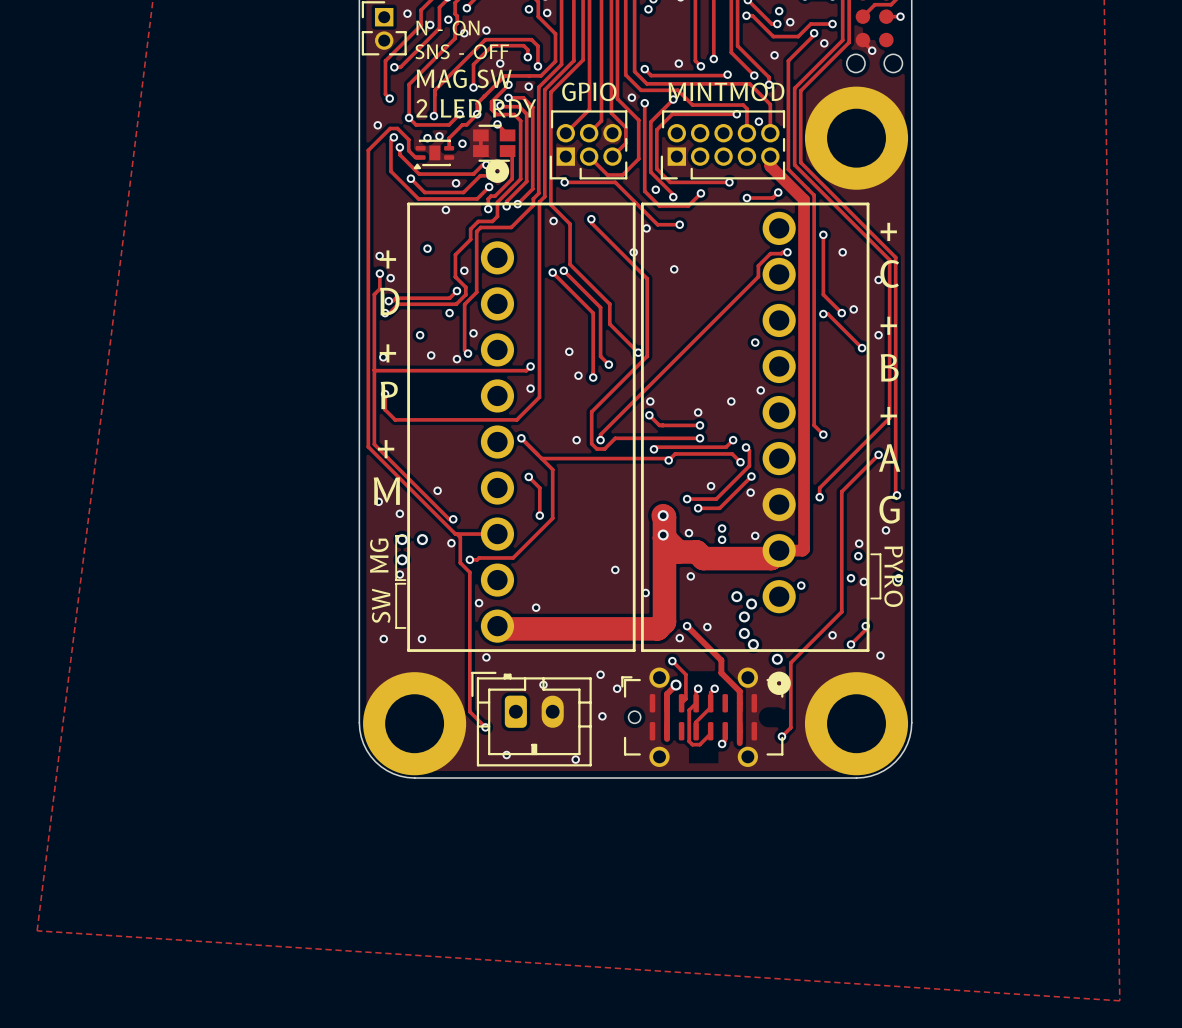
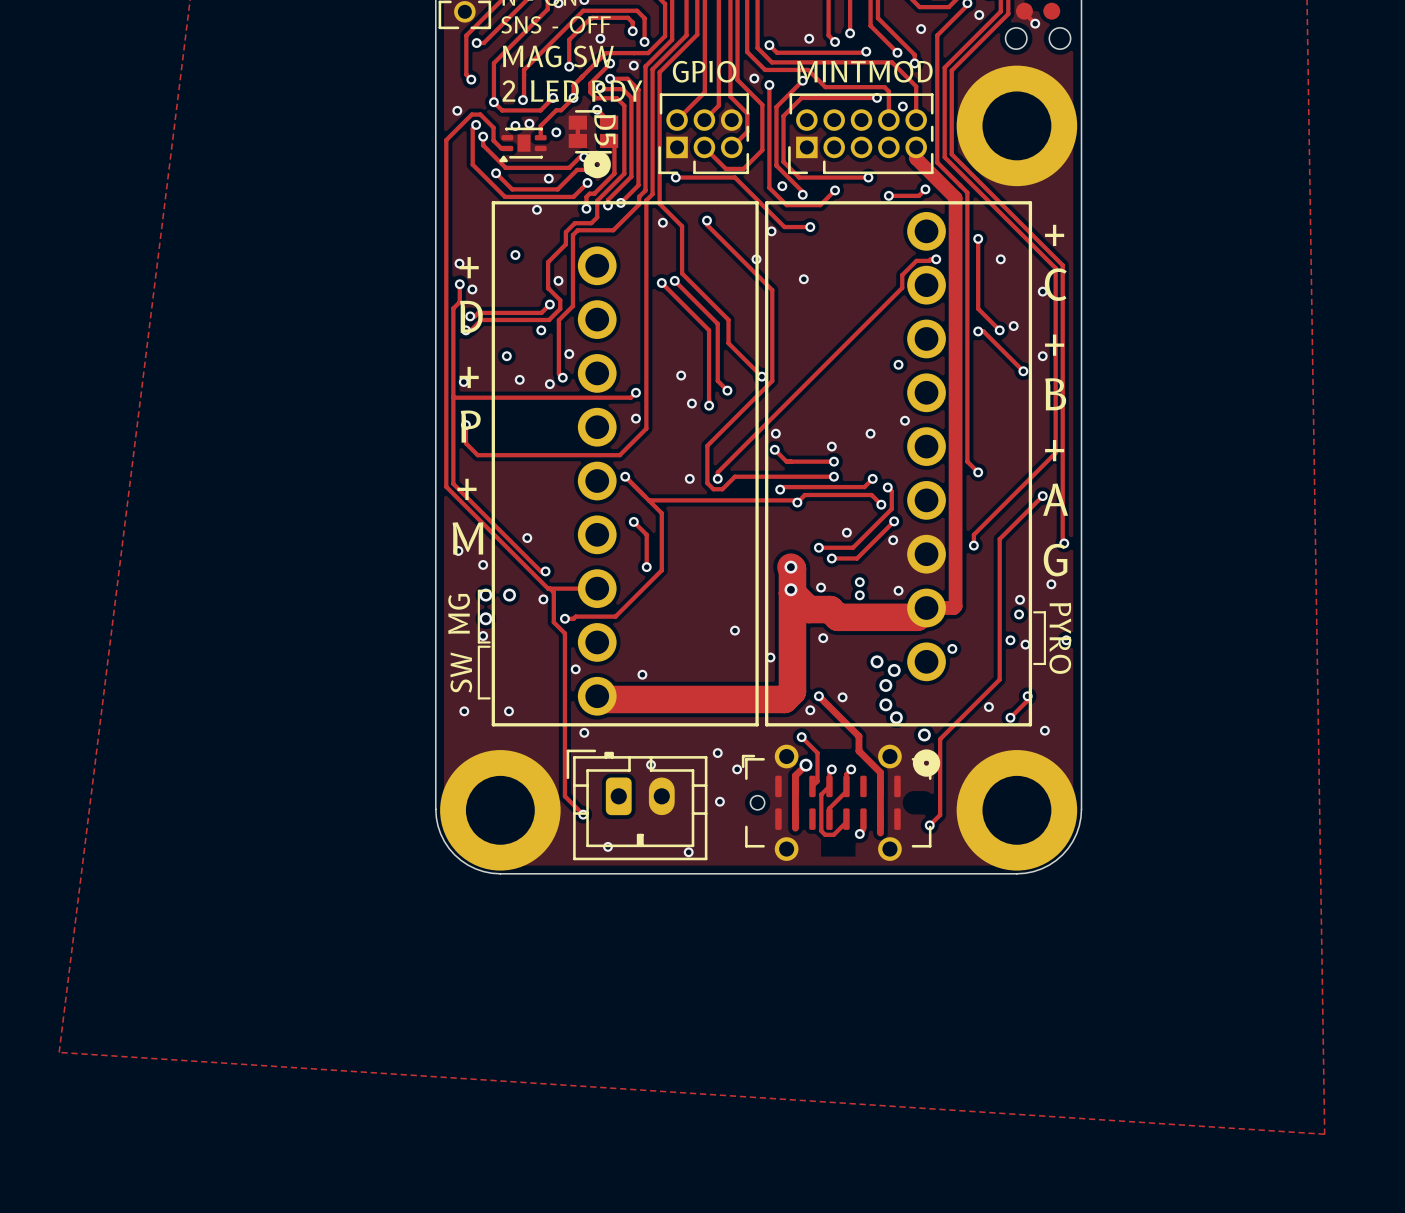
D5 name: none -> D5 (604, 130)

